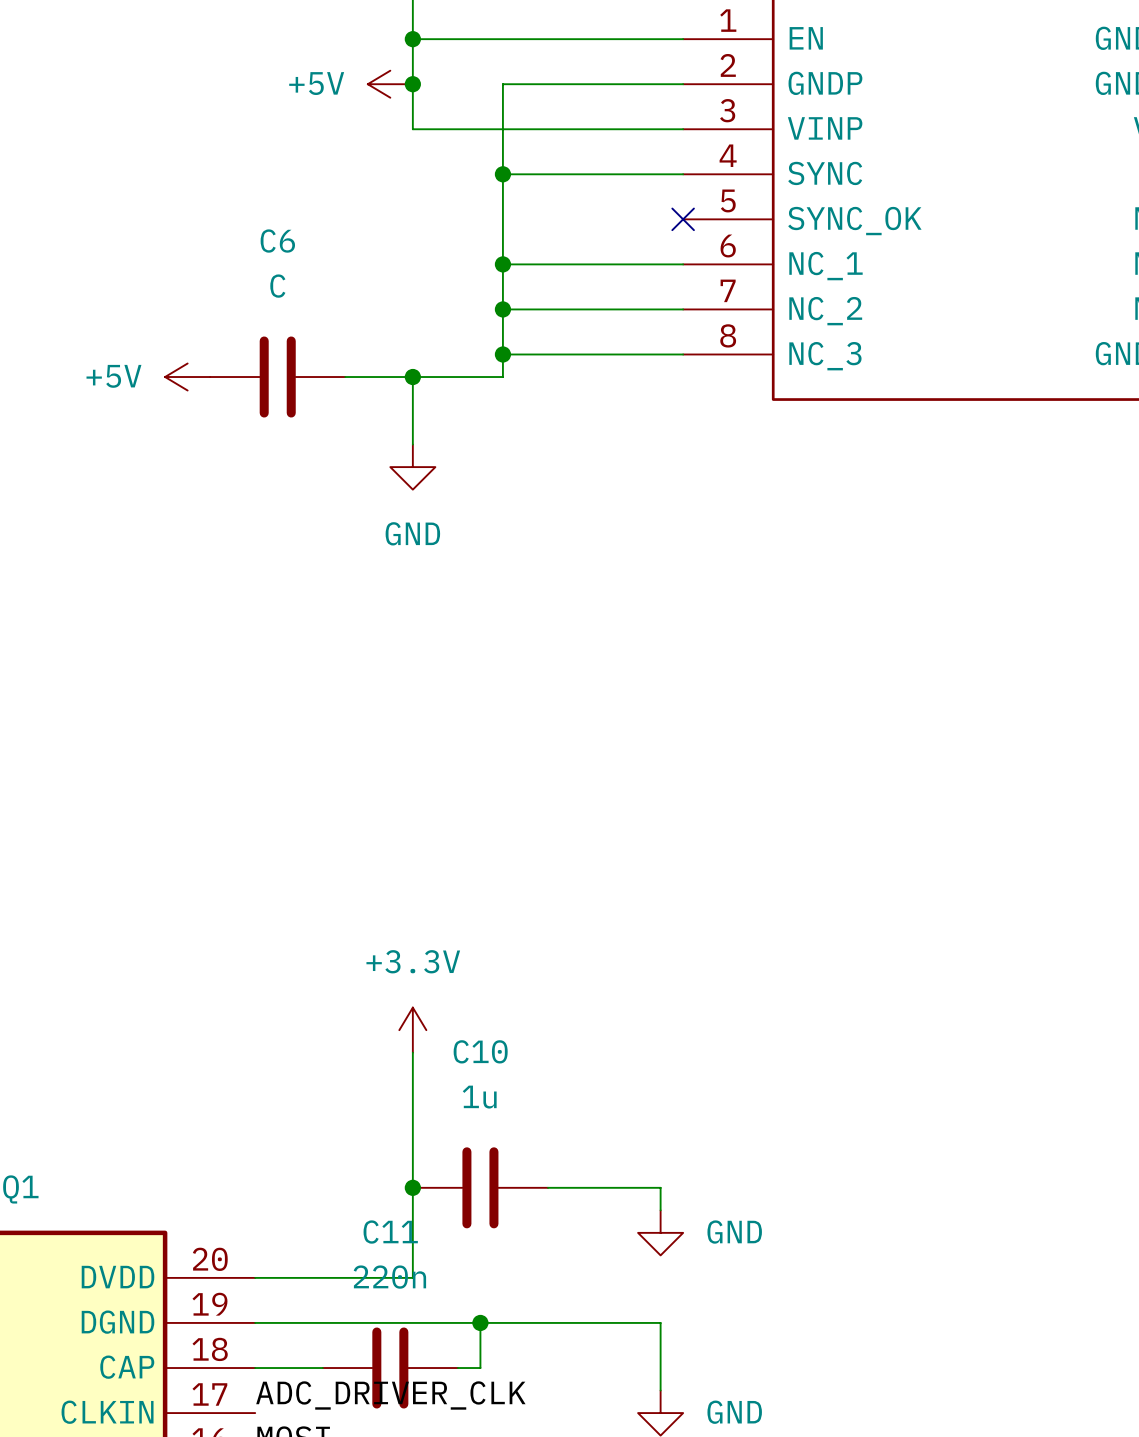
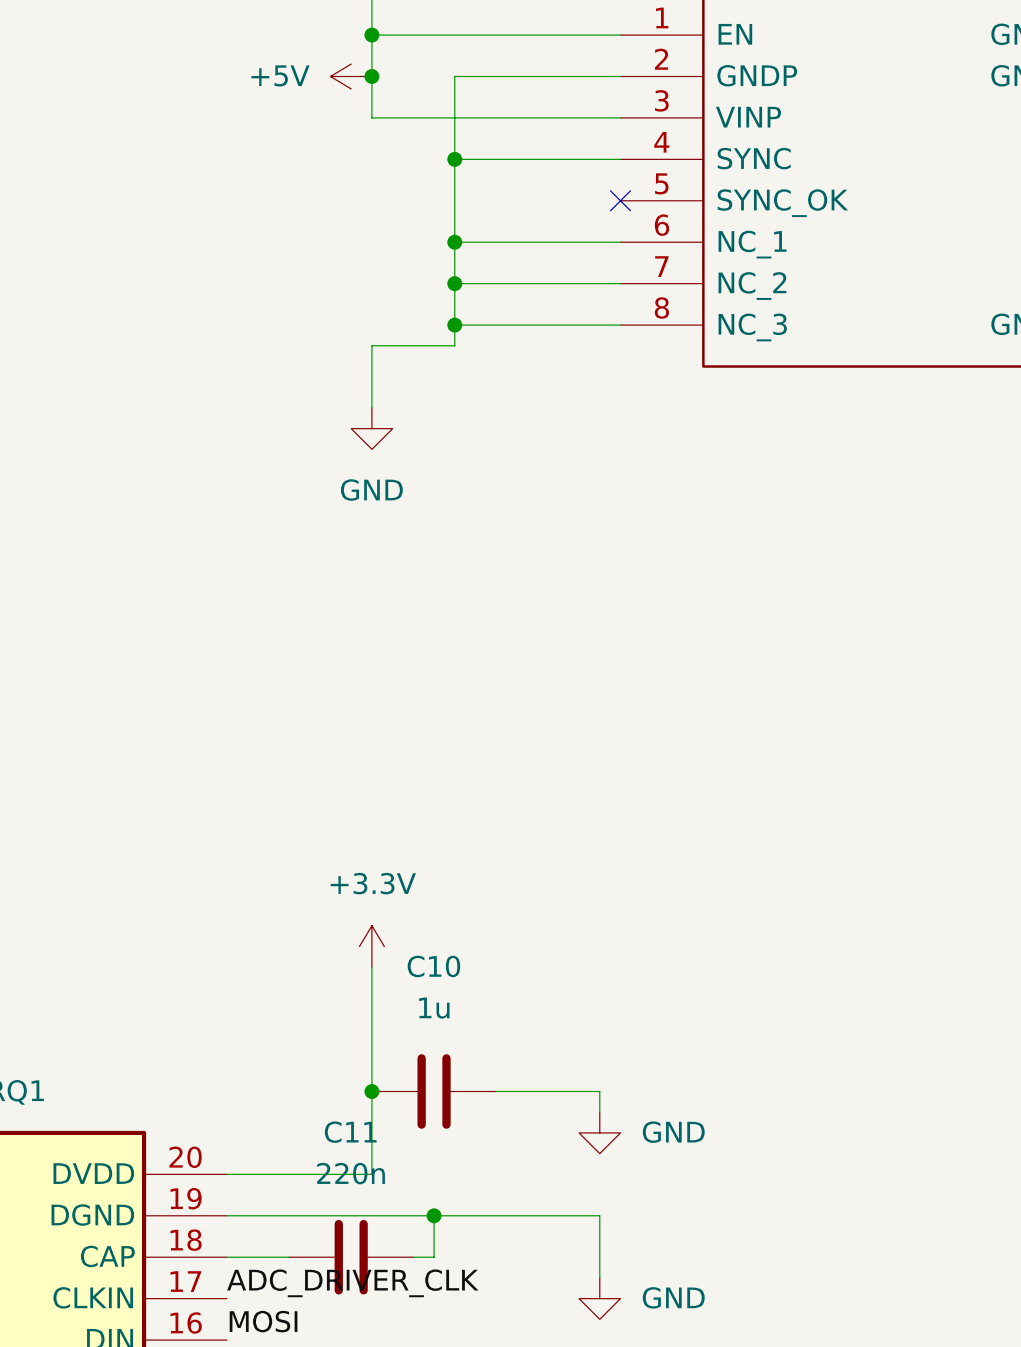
power symbol: +5V (187, 377) -> none
C6: C (277, 377) -> none
wire: (345, 377) (412, 377) -> none
junction: (412, 377) -> none

